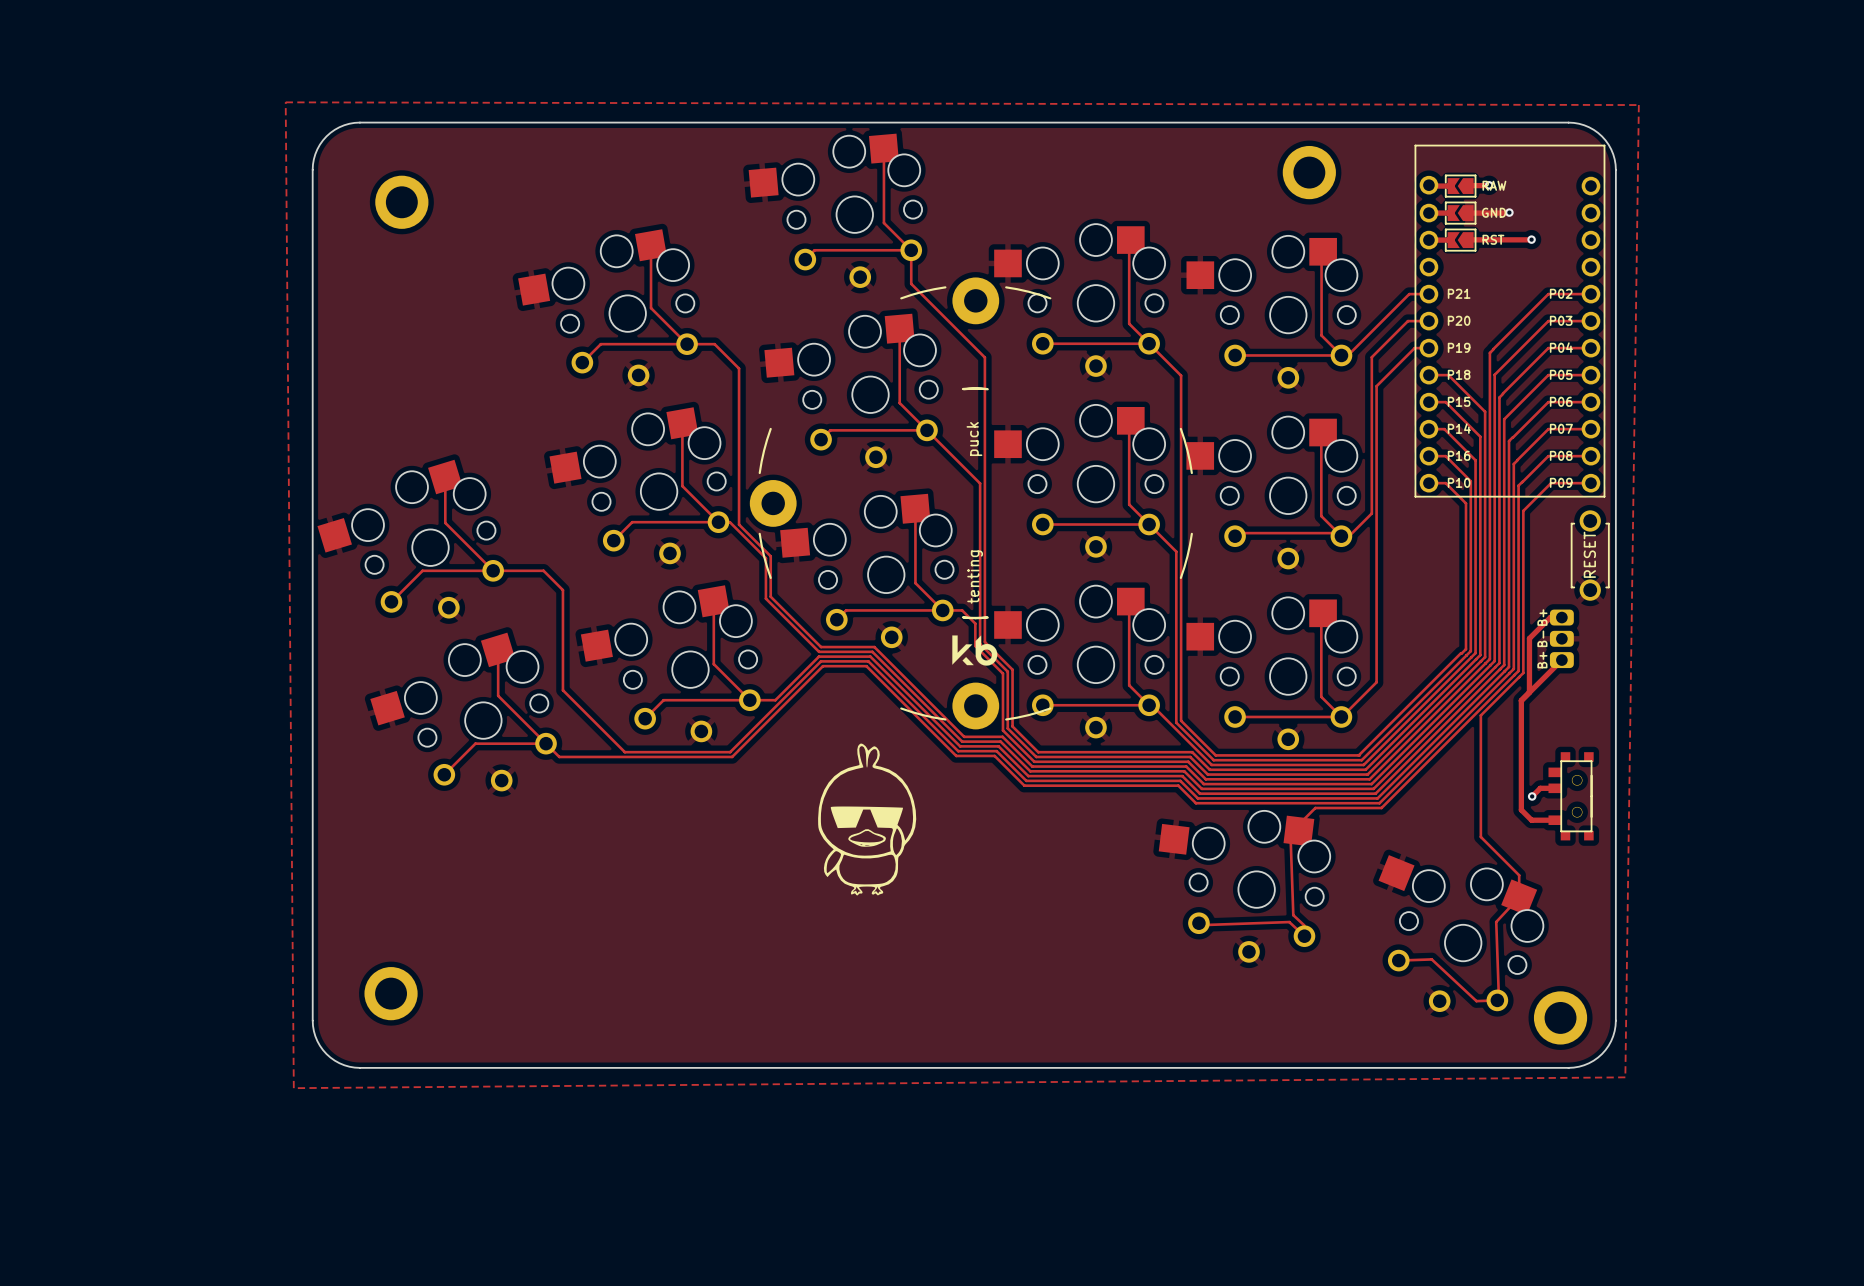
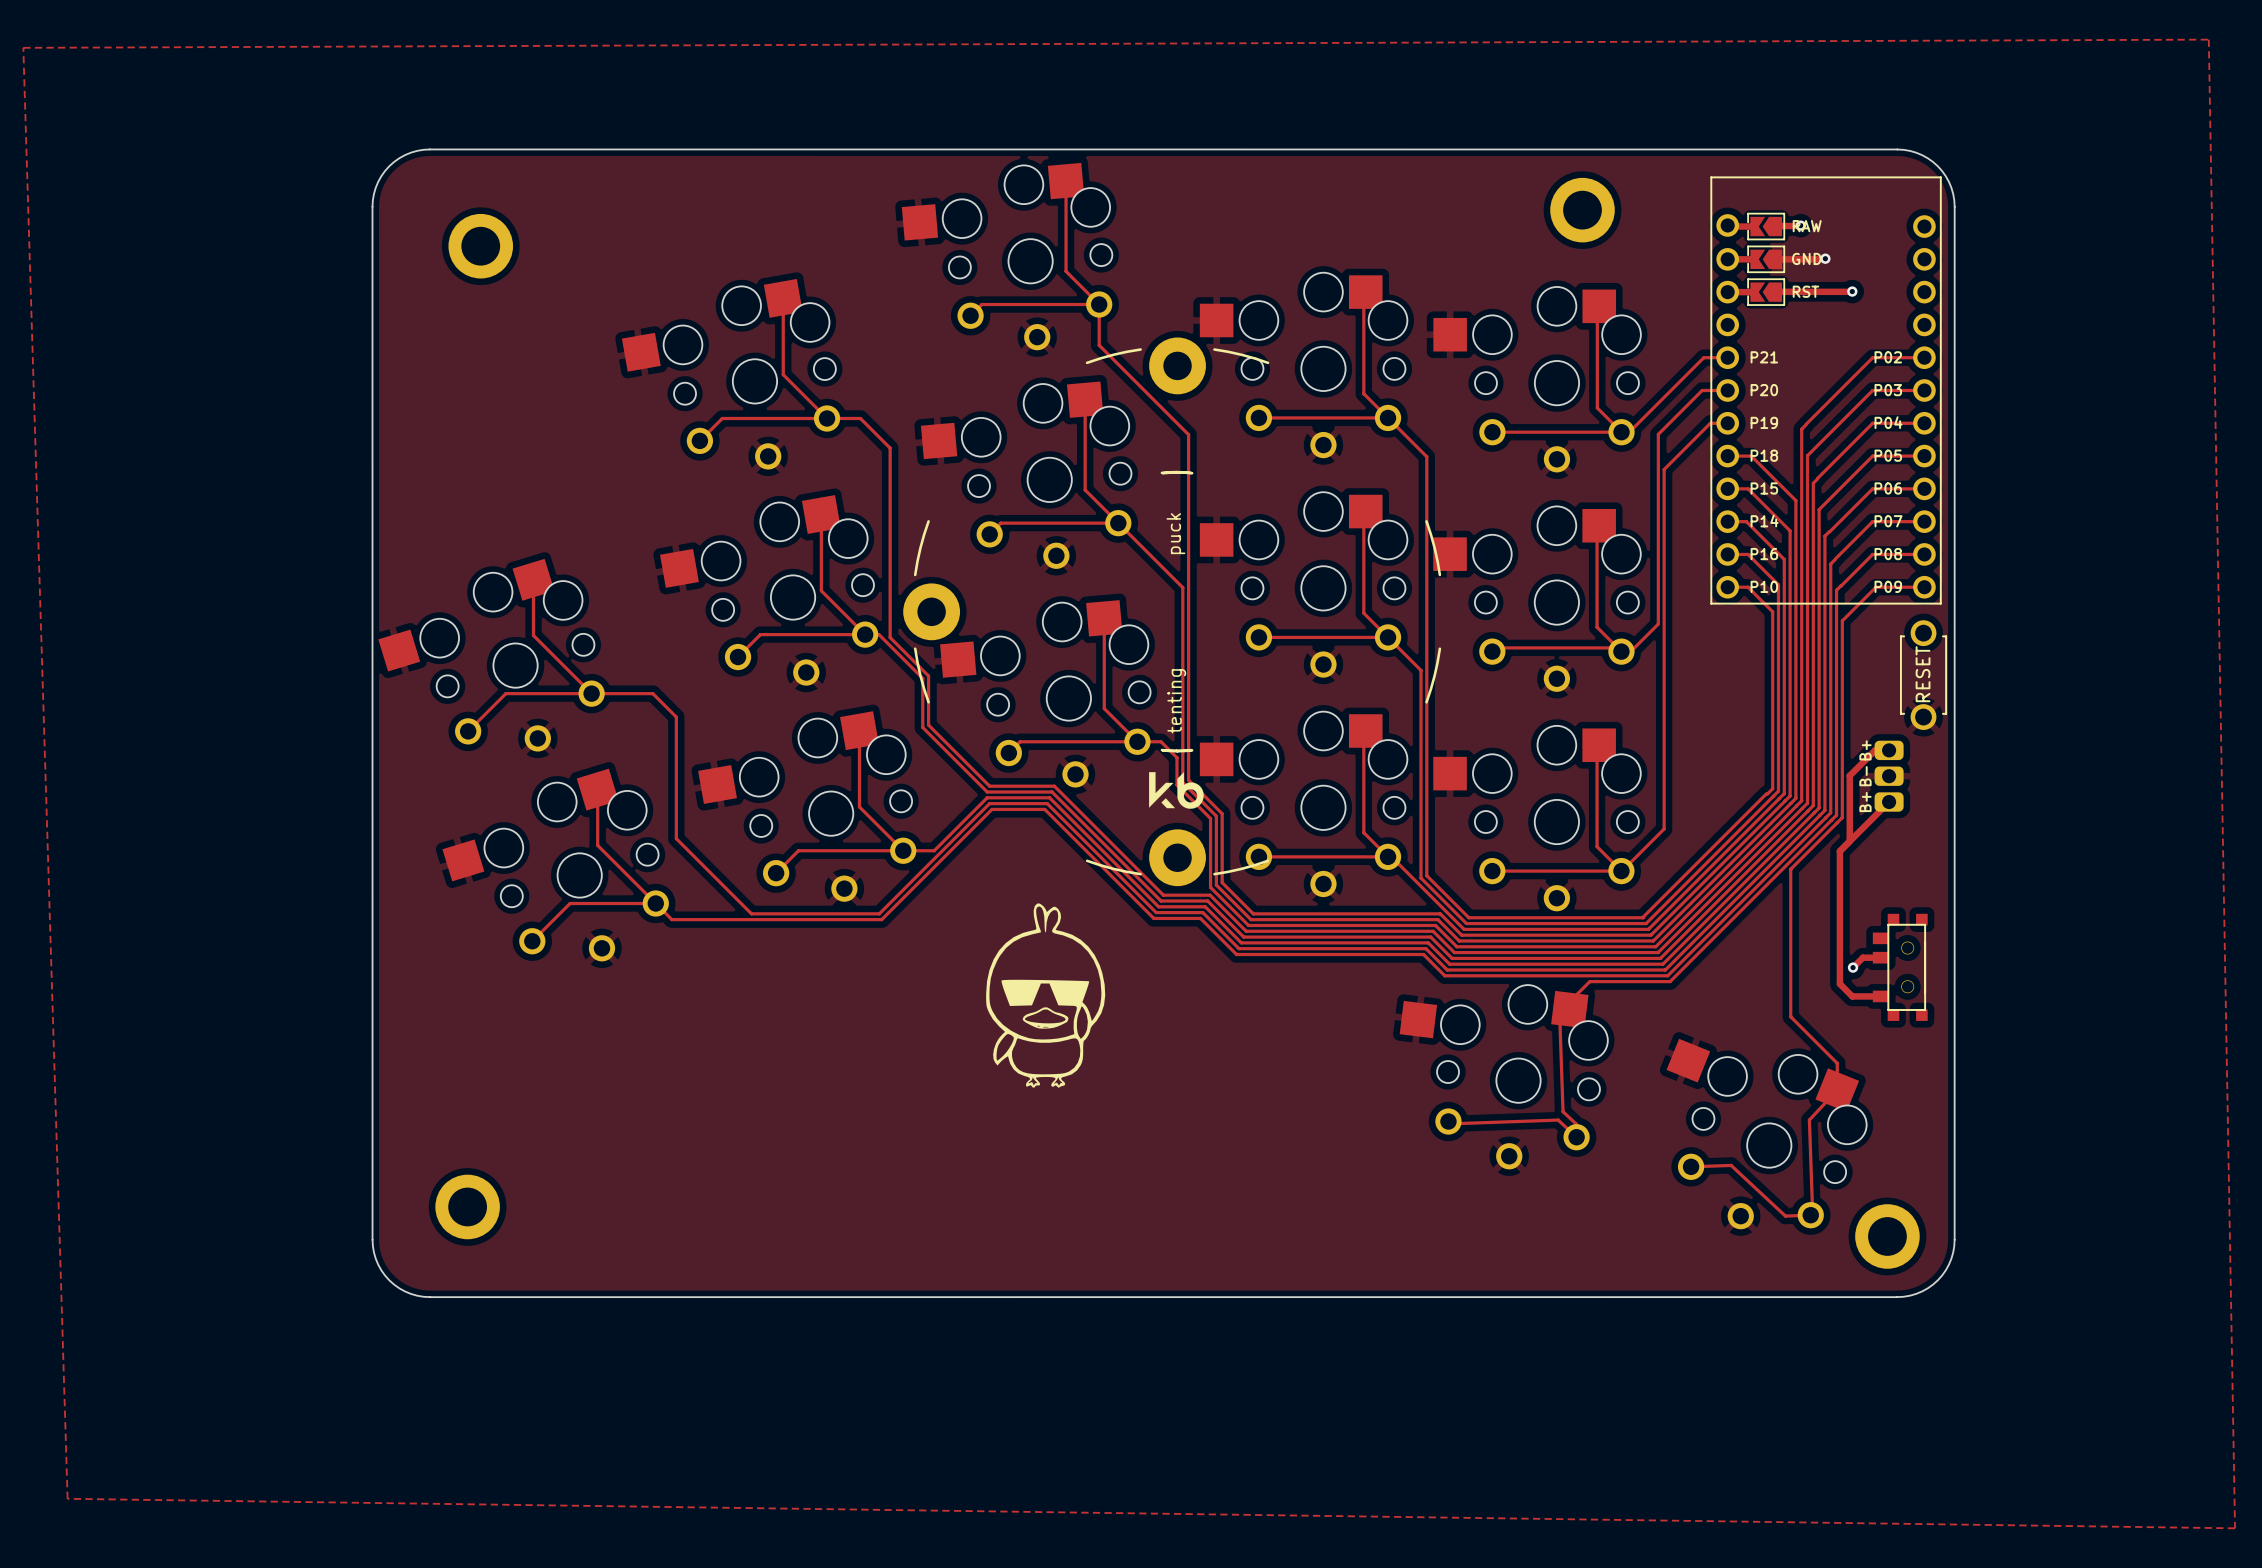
zone outline: (285, 102) (293, 1088) (1625, 1077) (1638, 105) (285, 102) -> (2208, 39) (23, 47) (67, 1498) (2235, 1528) (2208, 39)

